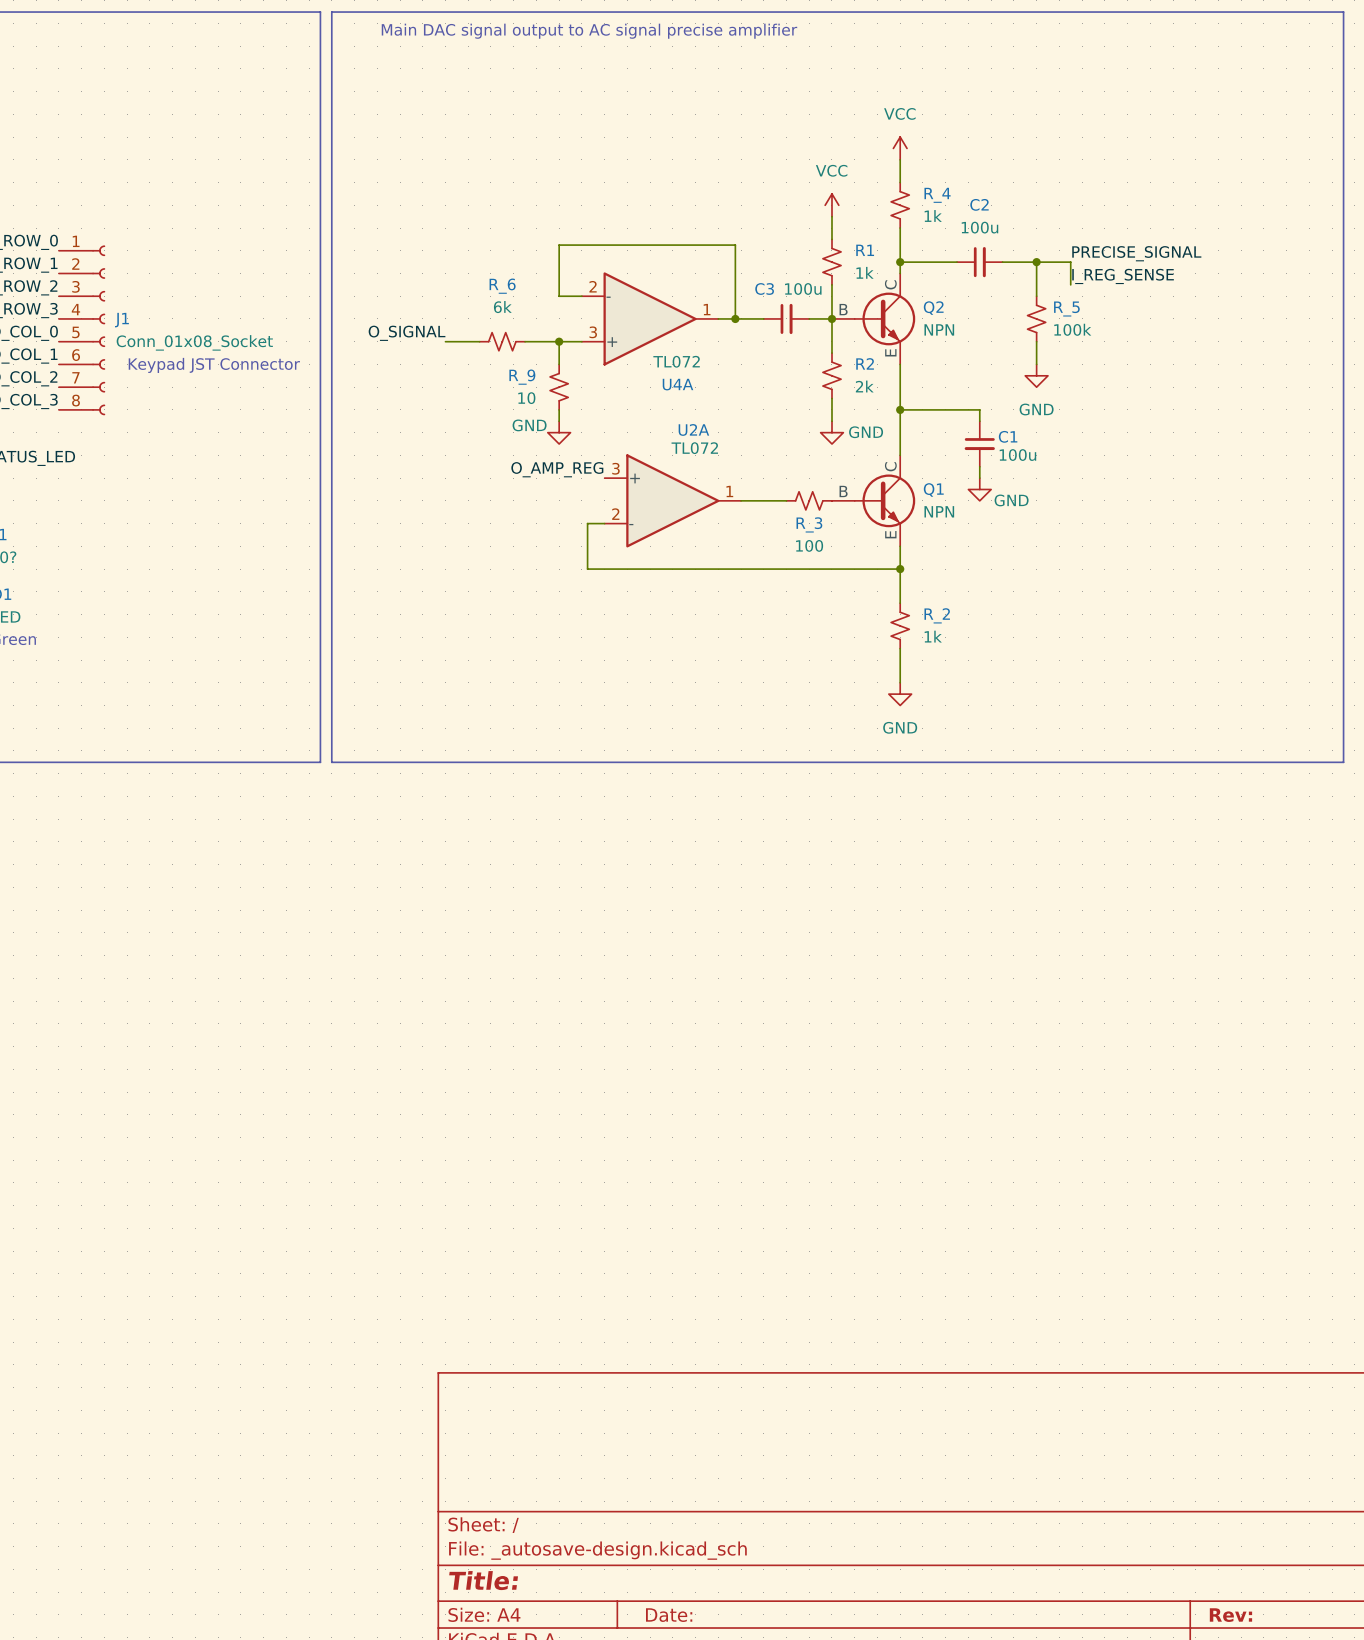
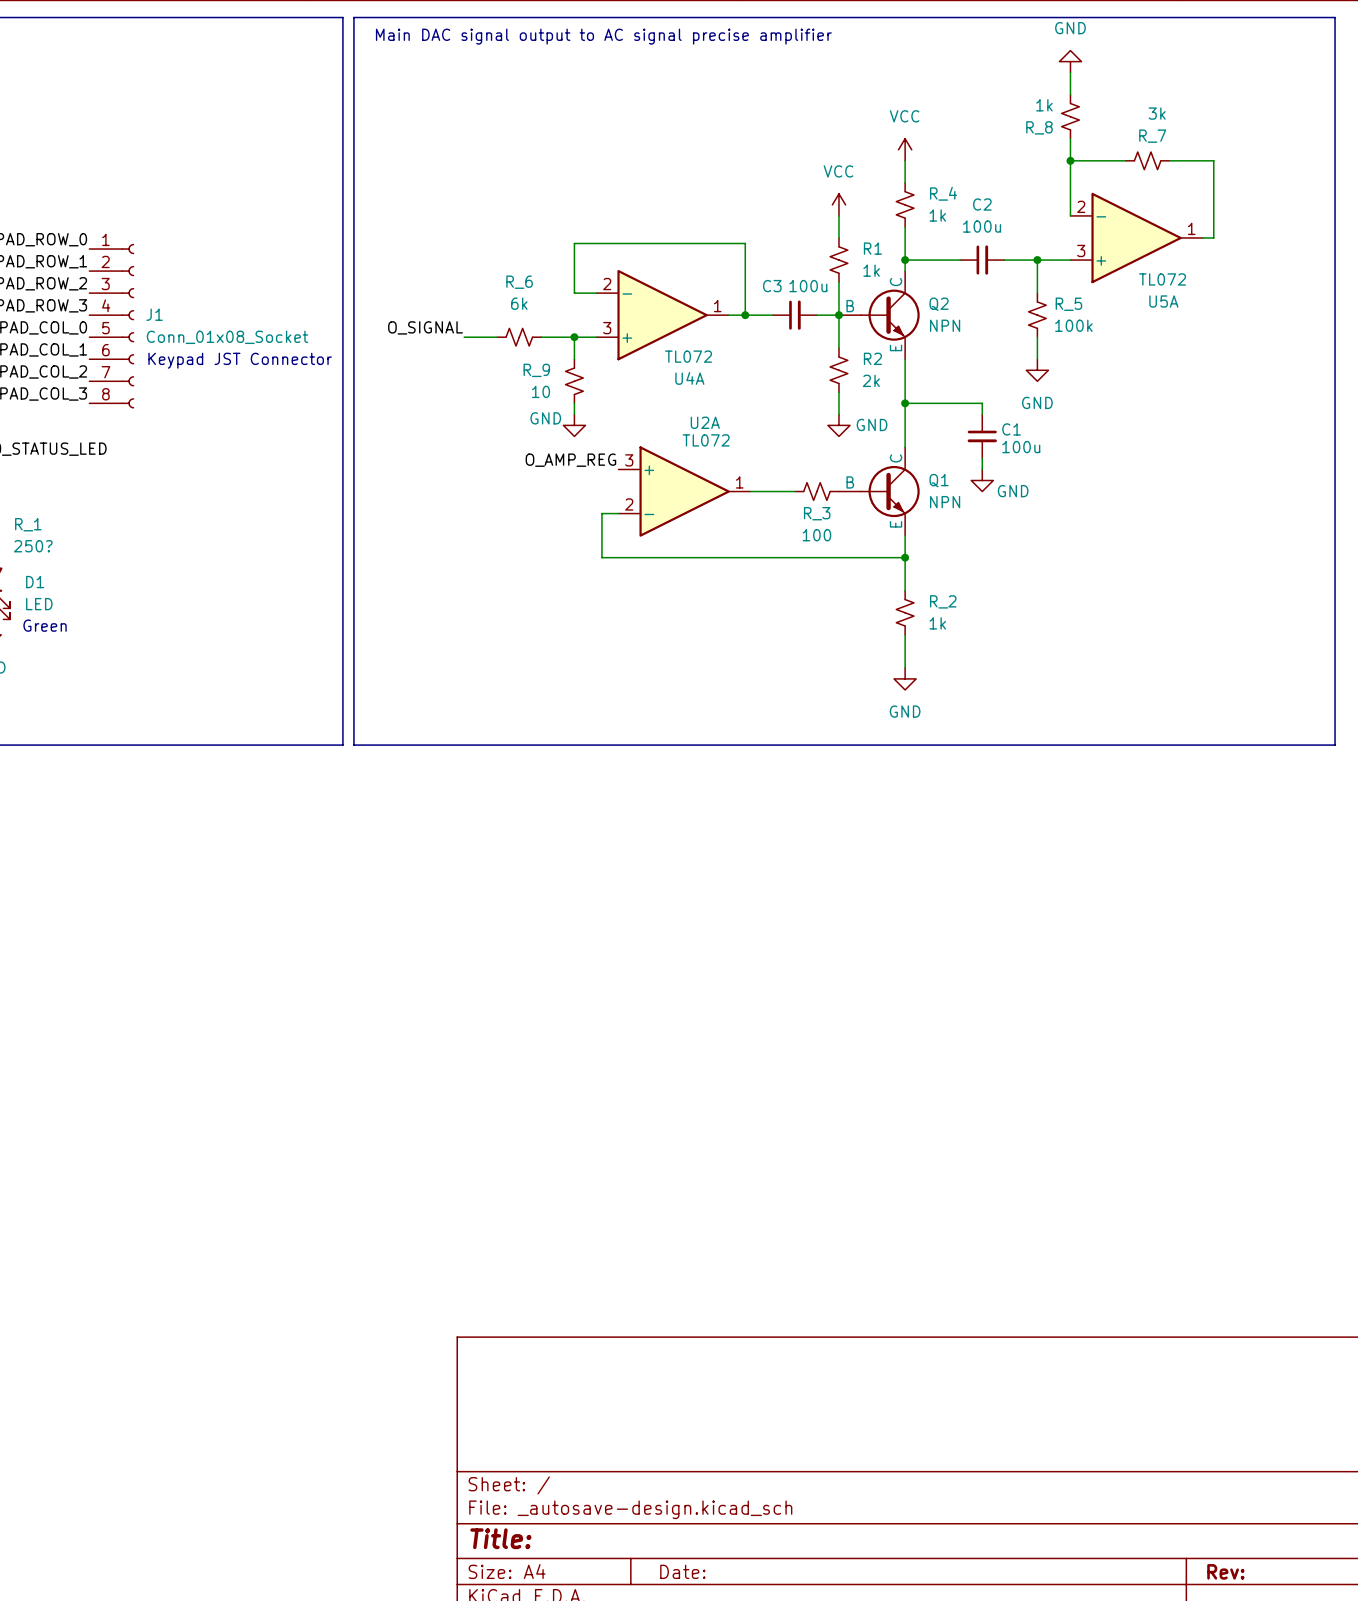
power symbol: none -> GND (1070, 61)
R_8: none -> 1k (1070, 116)
wire: none -> (1070, 138) (1070, 215)
wire: none -> (1070, 160) (1125, 160)
junction: none -> (1070, 160)
R_7: none -> 3k (1147, 160)
wire: none -> (1169, 160) (1213, 160) (1213, 237) (1202, 237)
U5A: none -> TL072 (1136, 237)
label: PRECISE_SIGNAL (1136, 253) -> none
wire: (1070, 262) (1070, 284) -> (1070, 72) (1070, 94)
label: I_REG_SENSE (1123, 276) -> none

